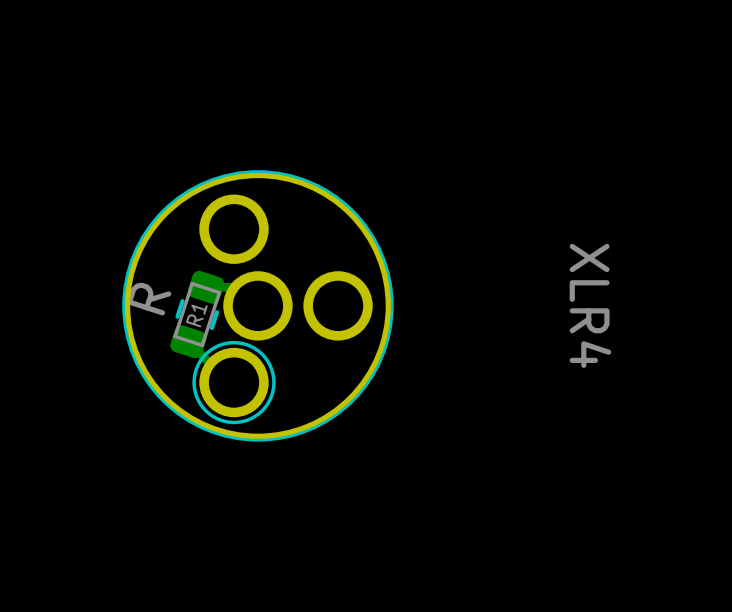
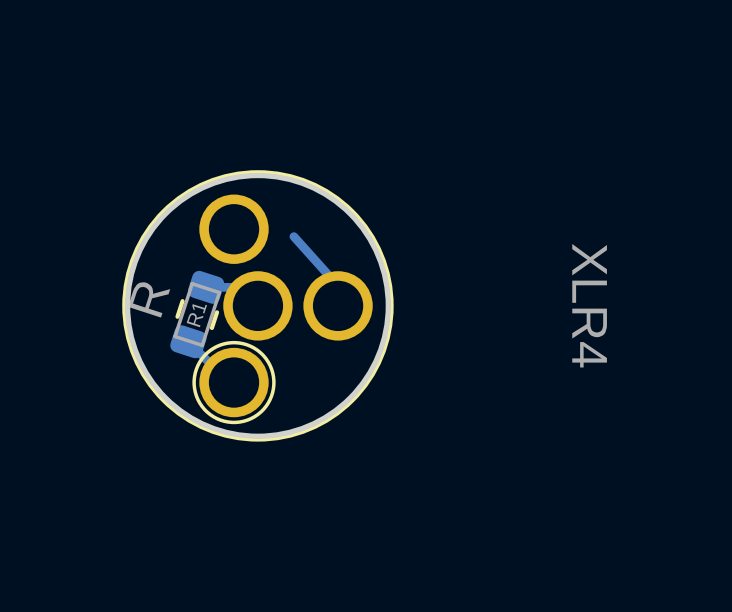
track: none -> (293, 236) (334, 281)

